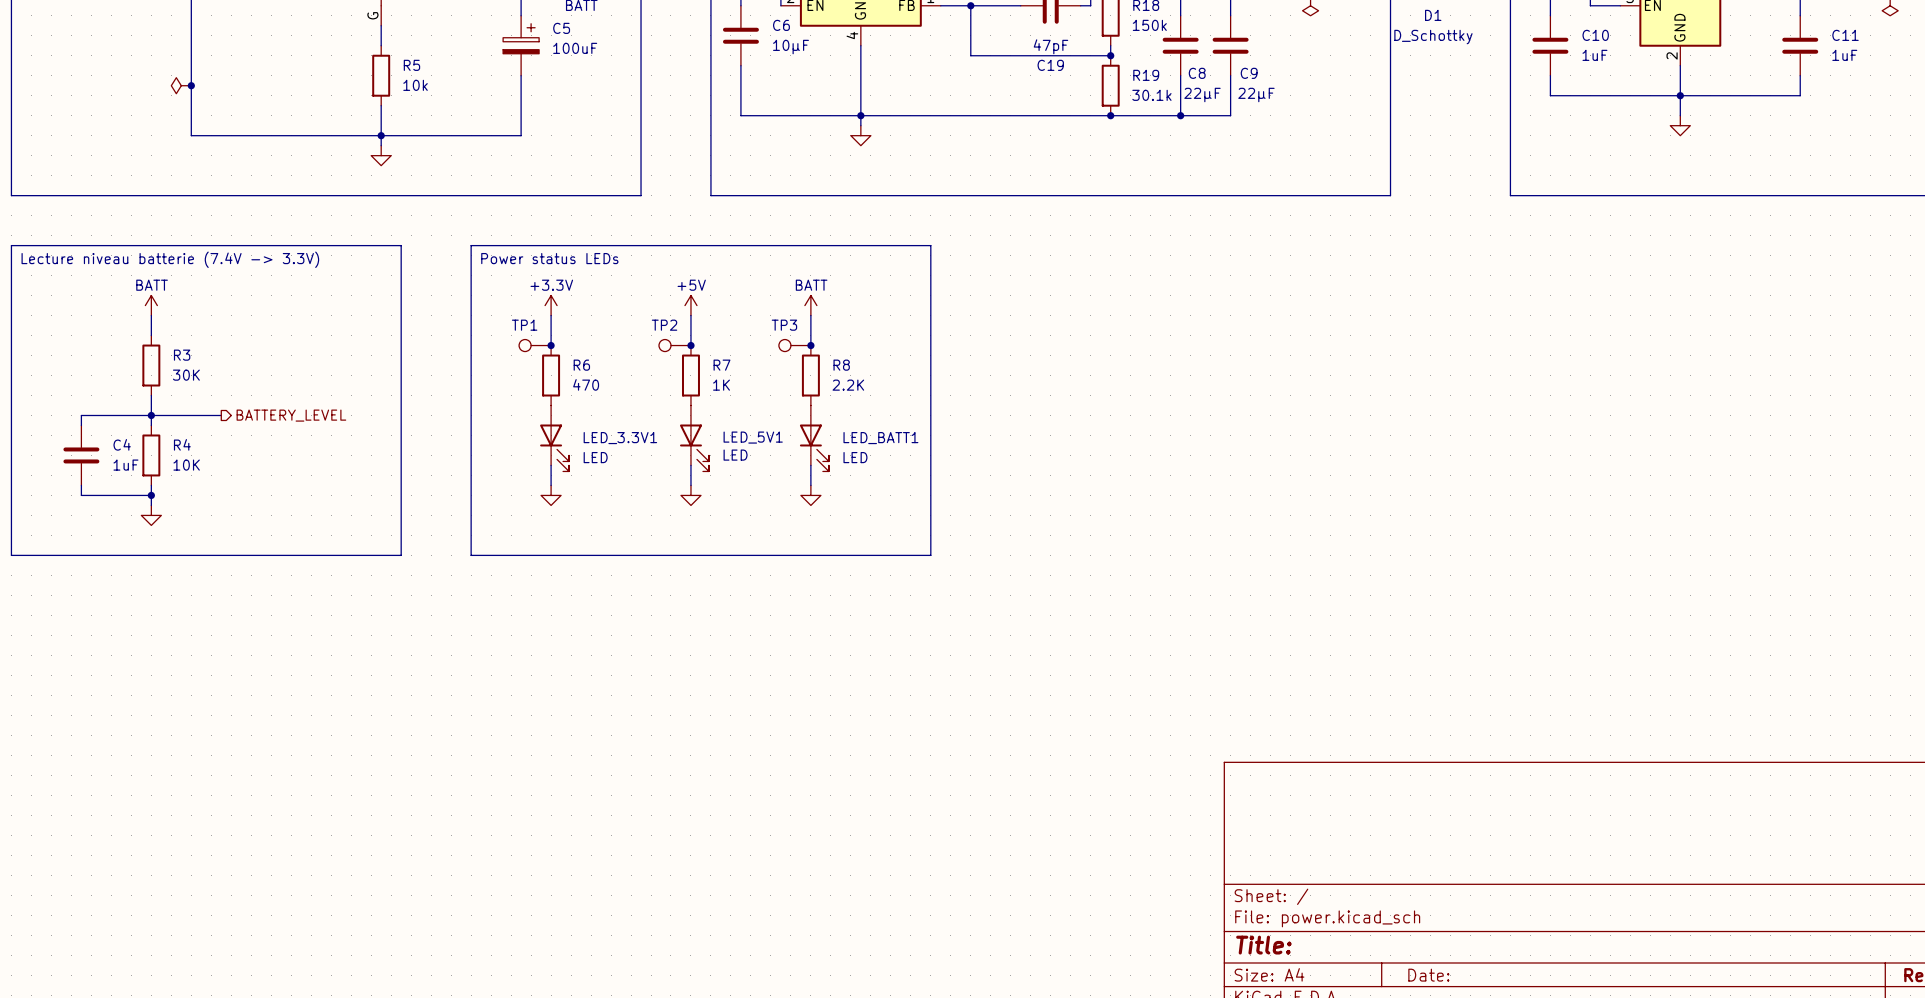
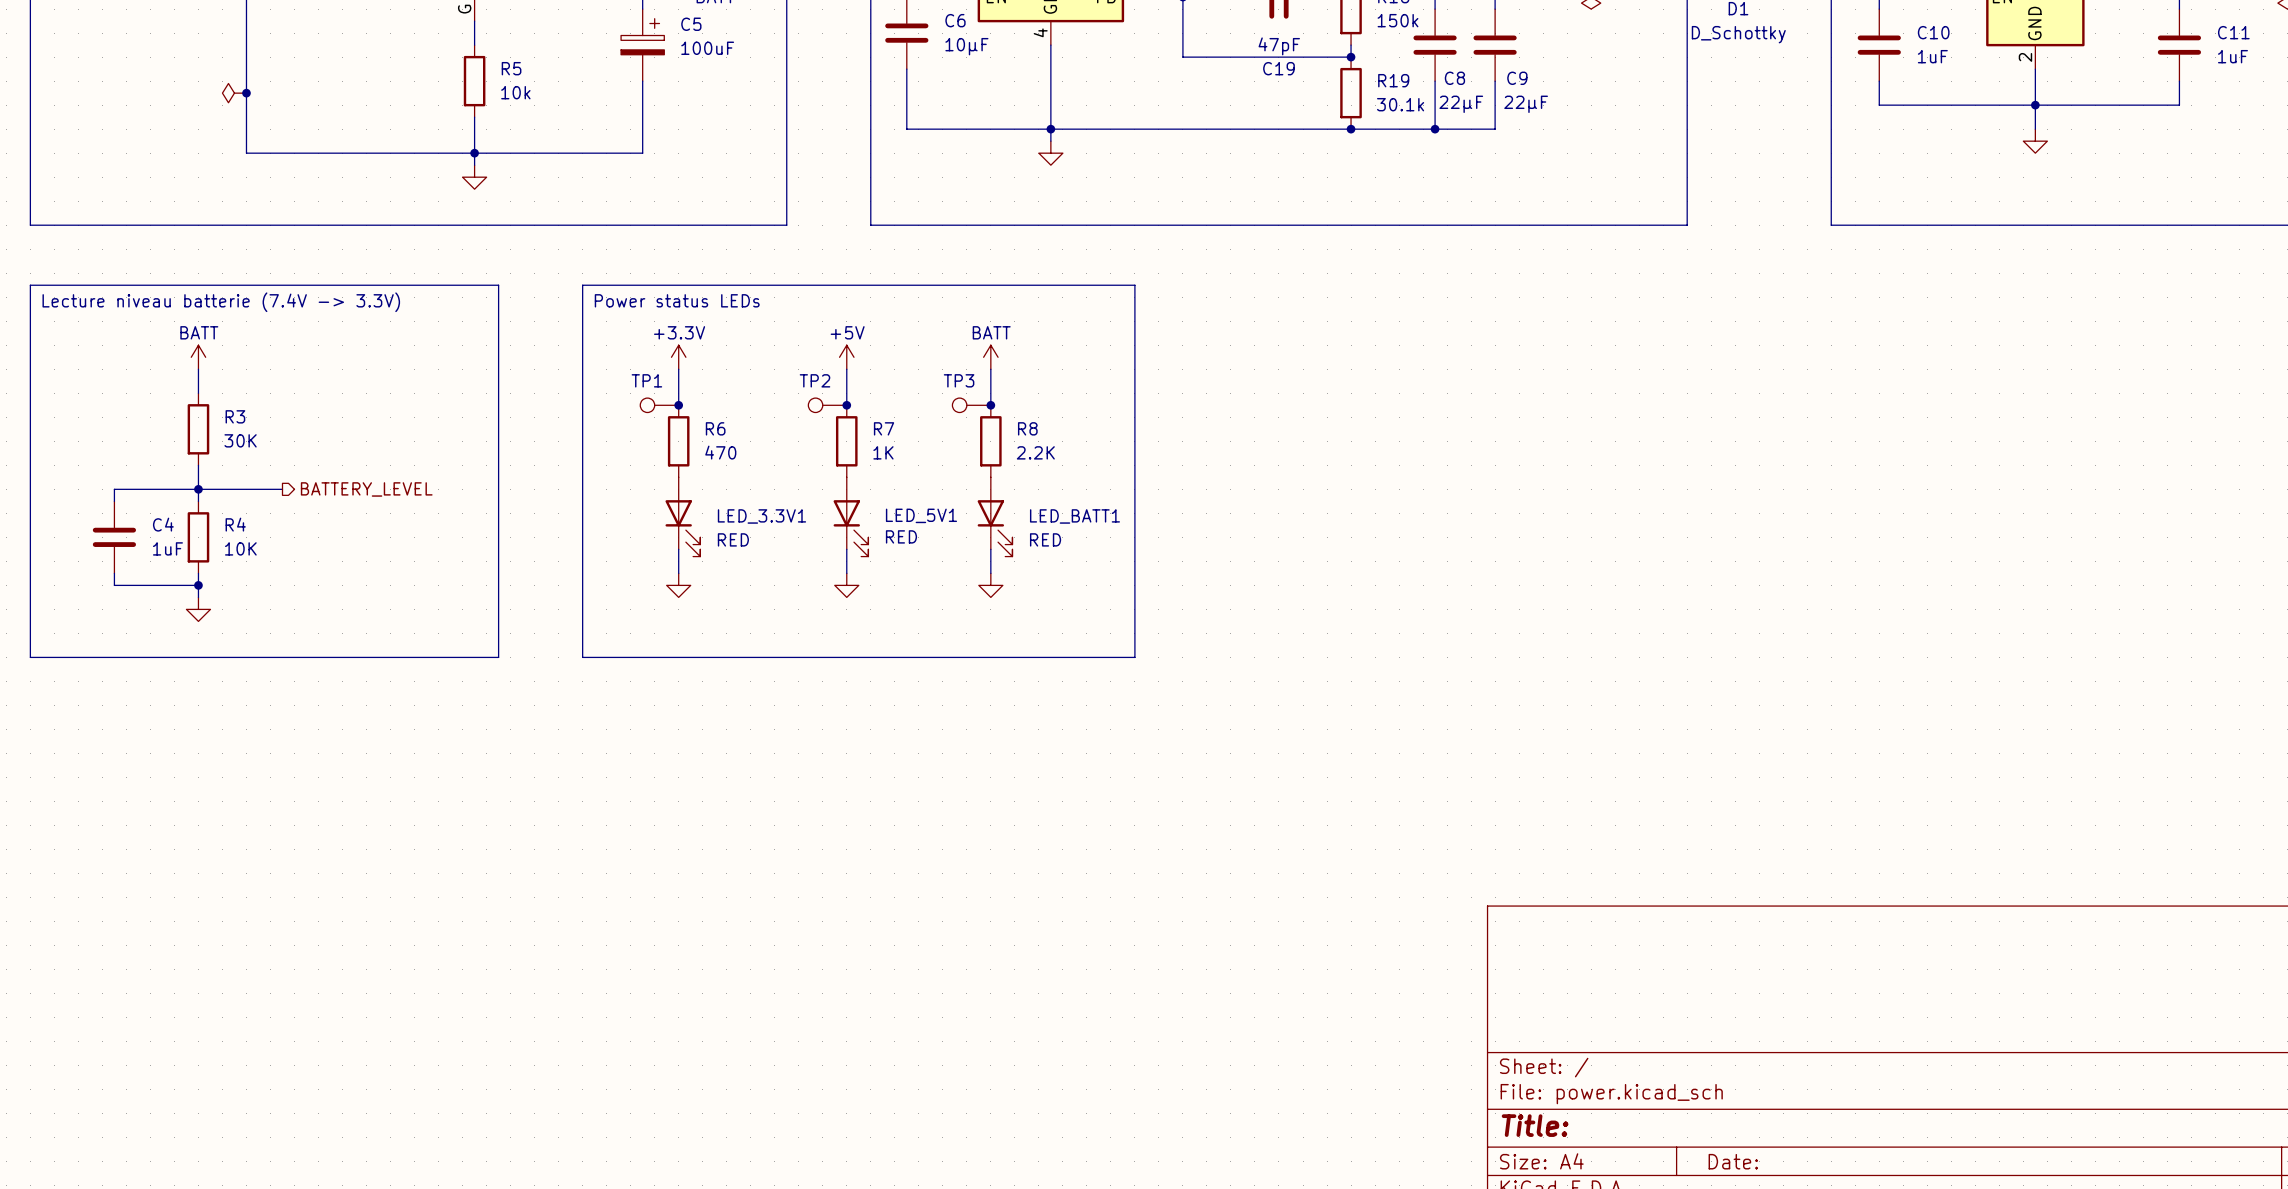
LED_5V1 value: LED (735, 455) -> RED (901, 536)
LED_3.3V1 value: LED (595, 457) -> RED (733, 539)
LED_BATT1 value: LED (855, 457) -> RED (1045, 539)

